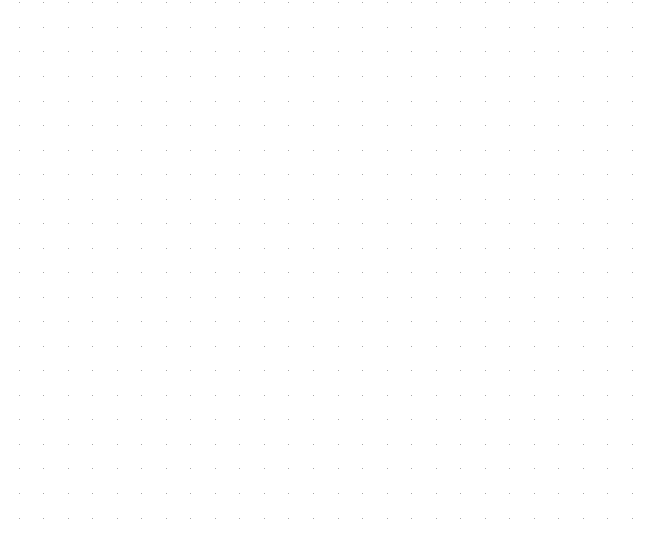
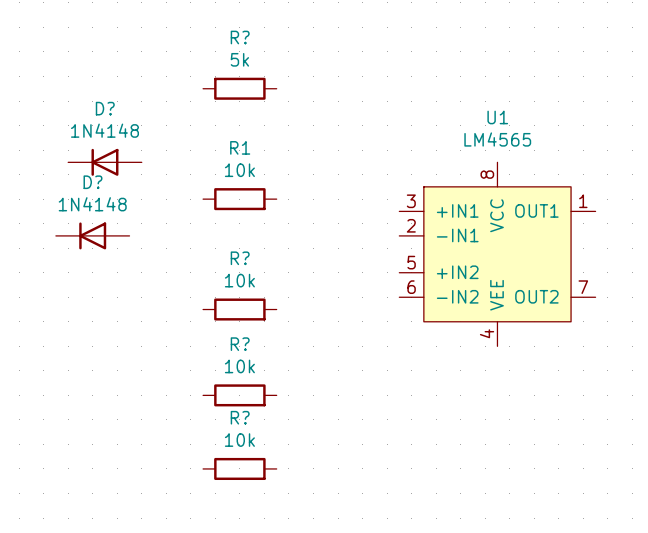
R?: none -> 5k (239, 88)
D?: none -> 1N4148 (104, 162)
R1: none -> 10k (239, 199)
D?: none -> 1N4148 (92, 235)
U1: none -> LM4565 (497, 254)
R?: none -> 10k (239, 309)
R?: none -> 10k (239, 395)
R?: none -> 10k (239, 468)

